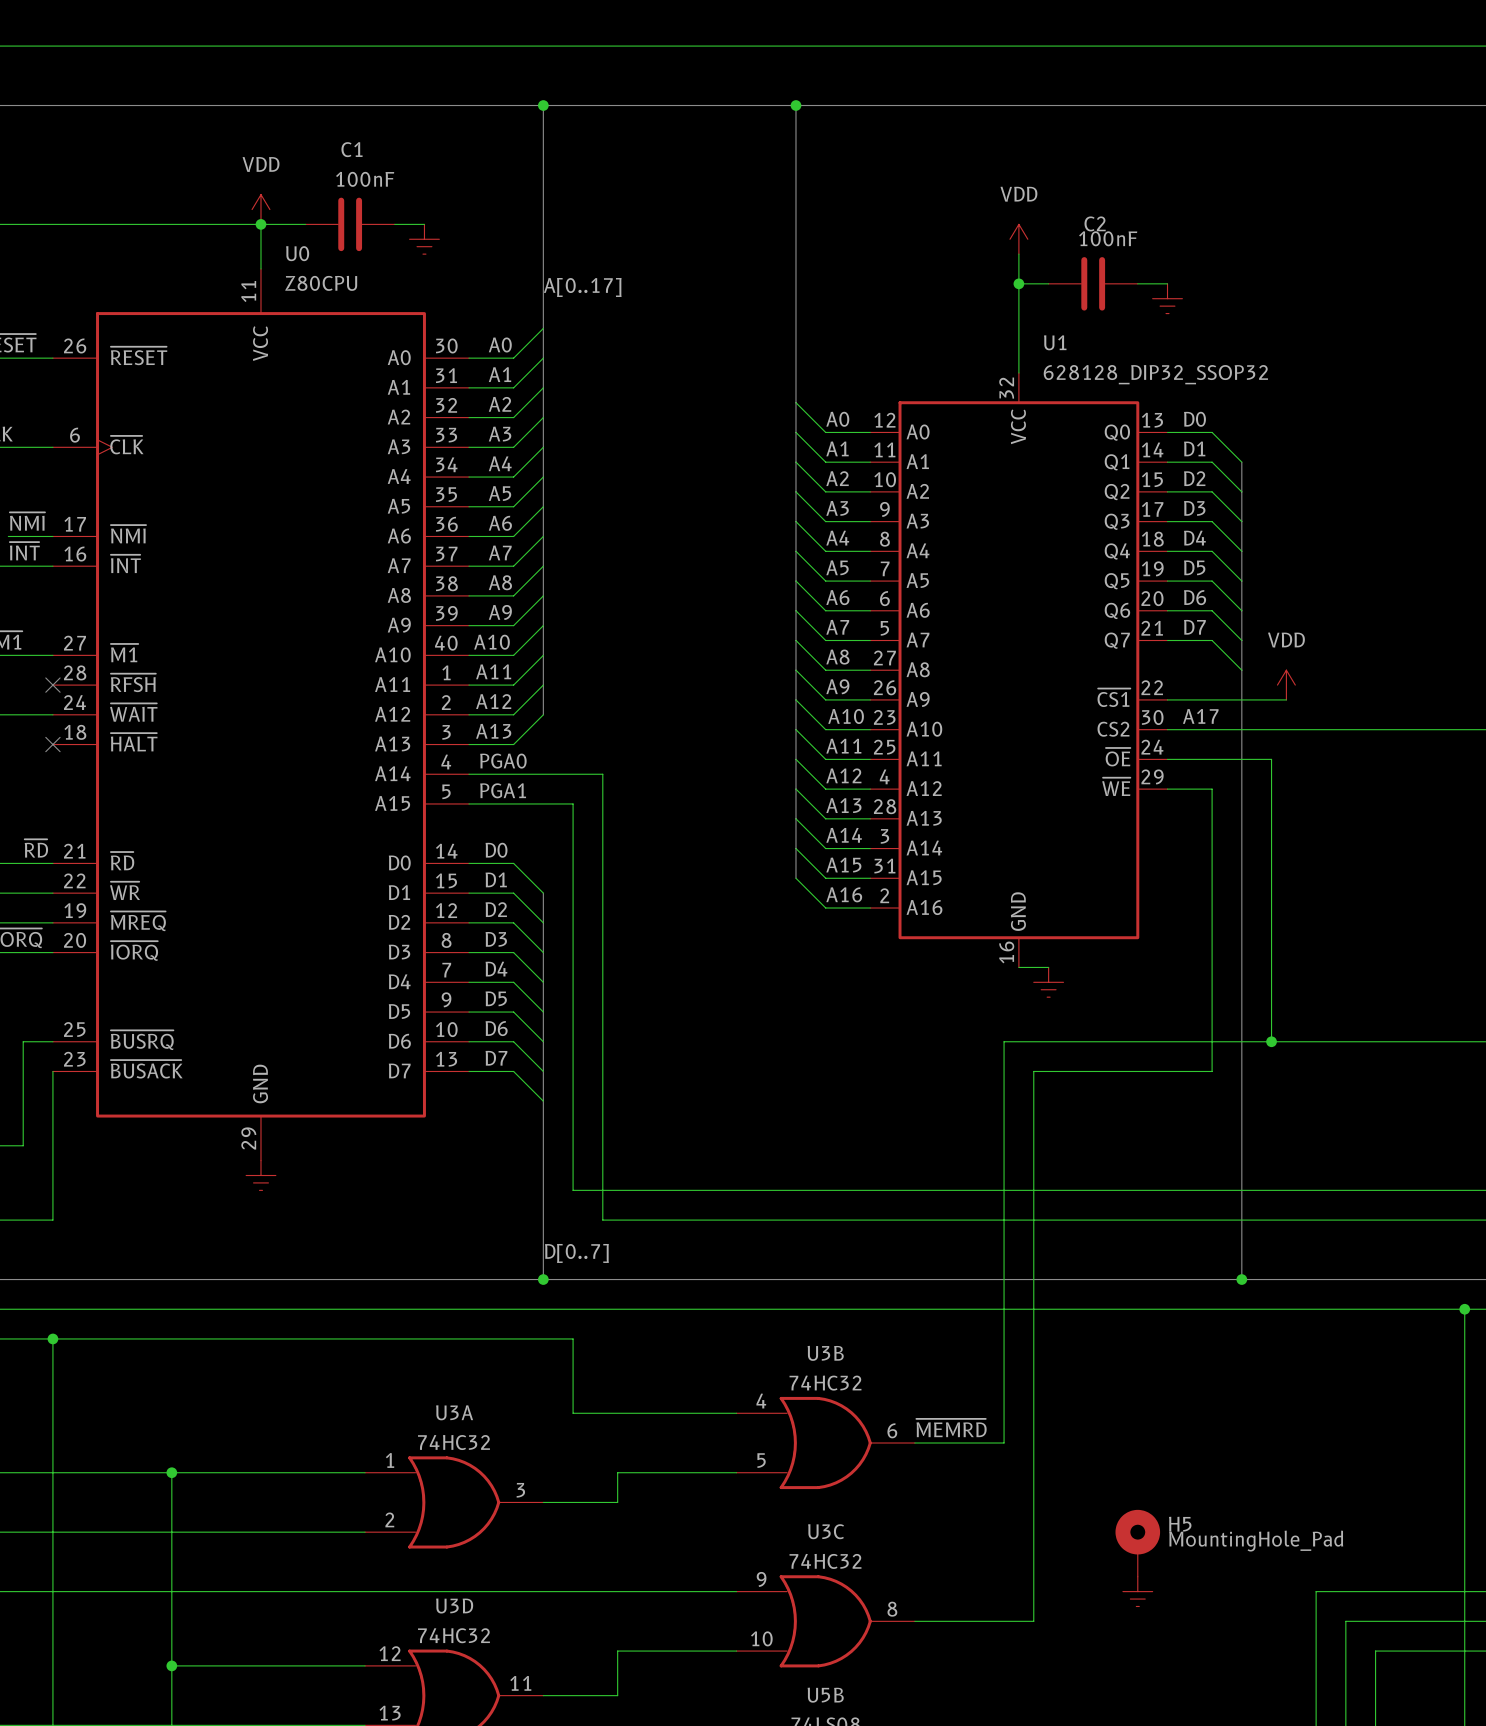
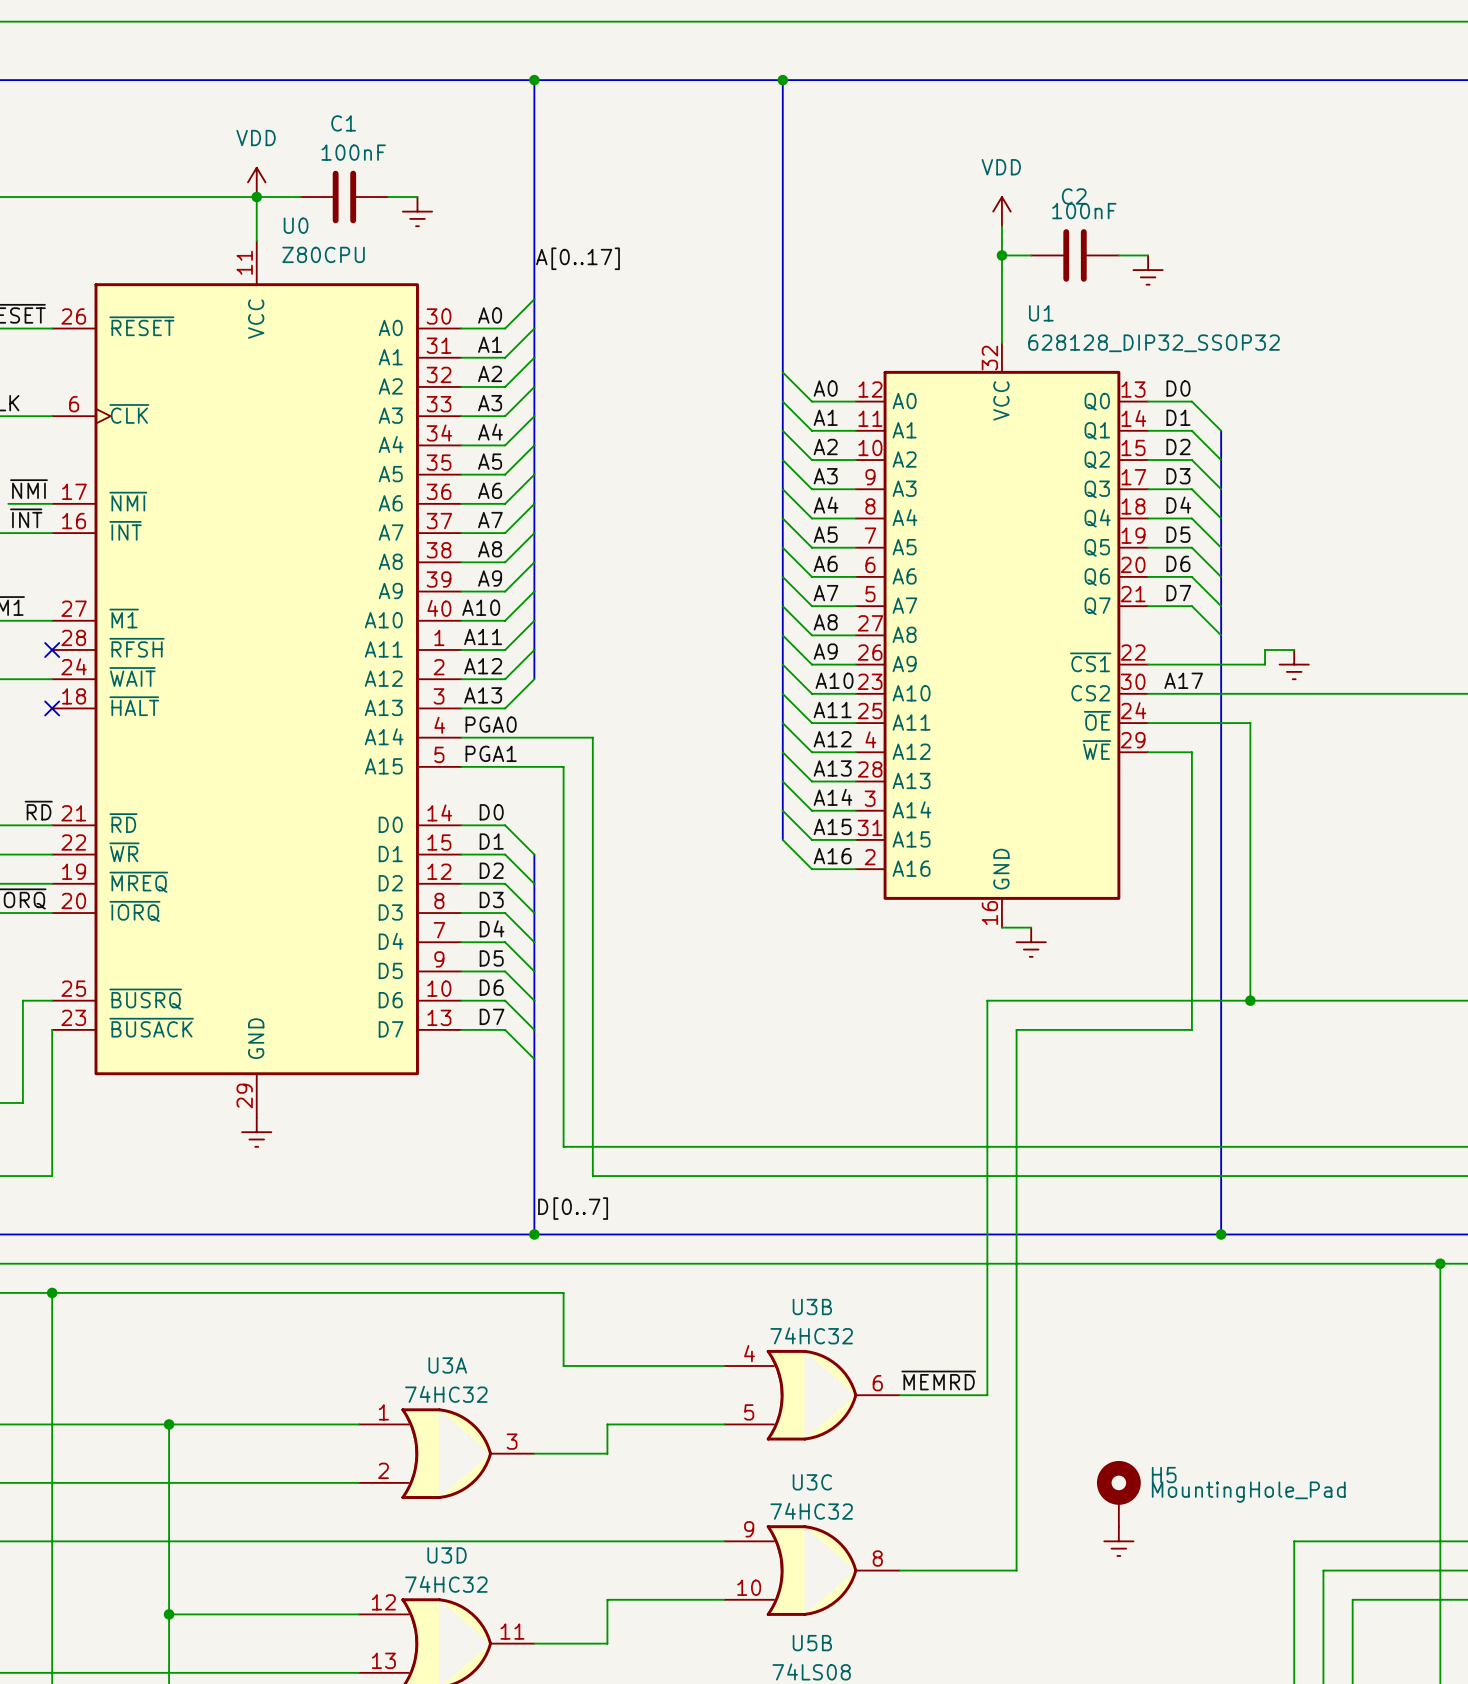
power symbol: VDD (1286, 685) -> none
wire: none -> (1294, 649) (1264, 649) (1264, 664)
power symbol: none -> (1294, 664)

